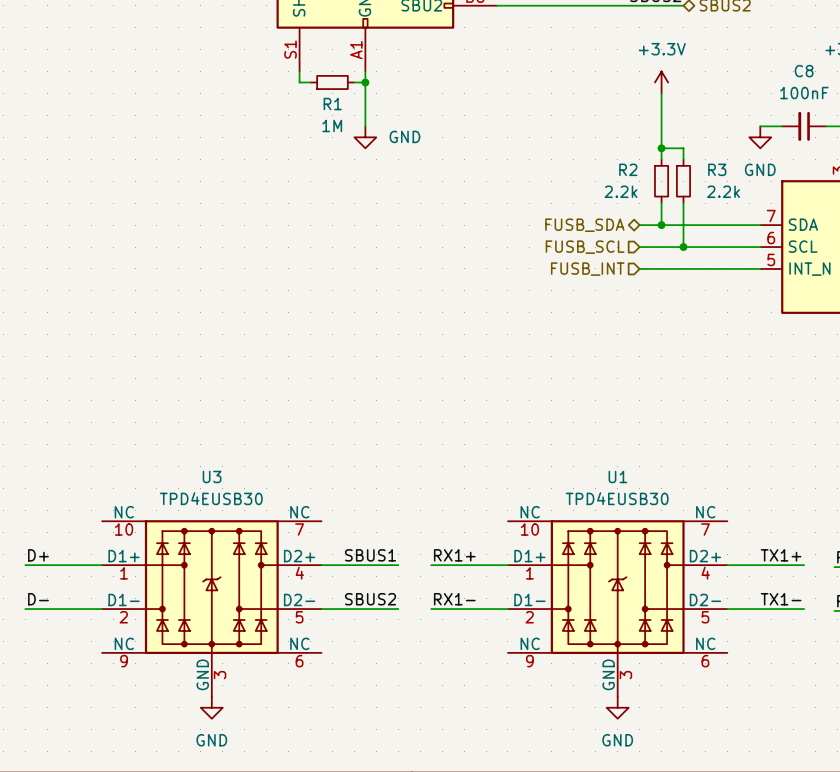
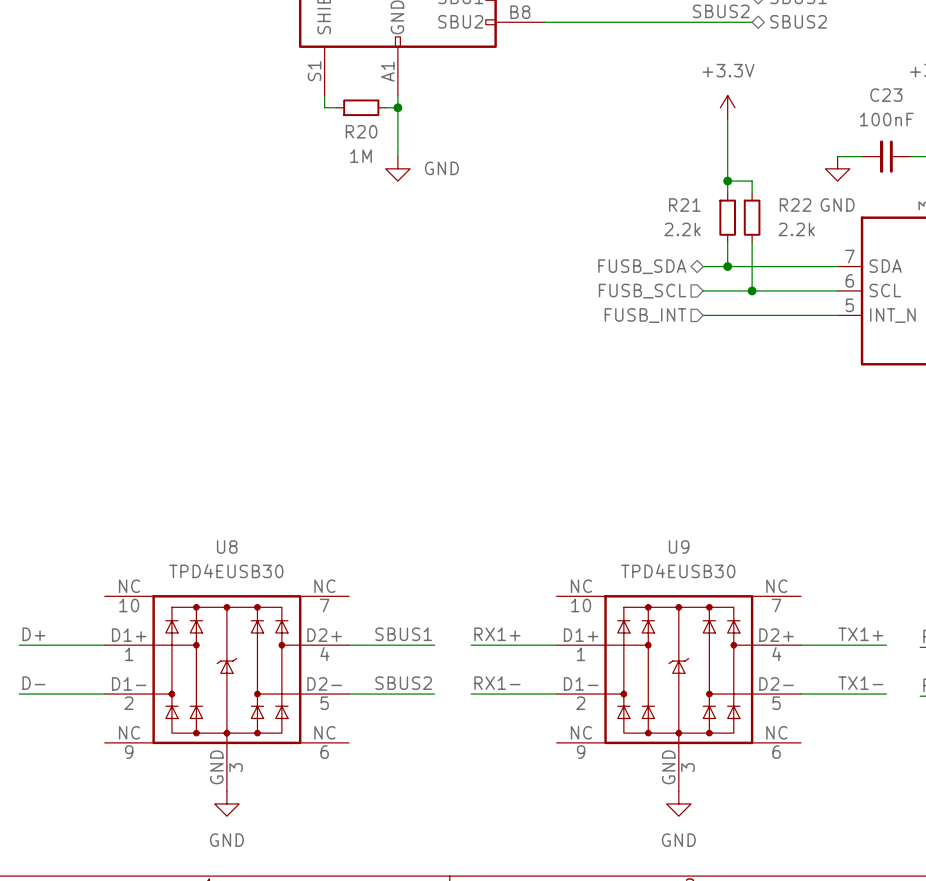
C8 name: C8 (804, 71) -> C23 (886, 95)
R1 name: R1 (332, 104) -> R20 (361, 131)
R2 name: R2 (628, 169) -> R21 (684, 205)
R3 name: R3 (717, 169) -> R22 (795, 205)
U3 name: U3 (212, 476) -> U8 (227, 547)
U1 name: U1 (617, 476) -> U9 (679, 547)

